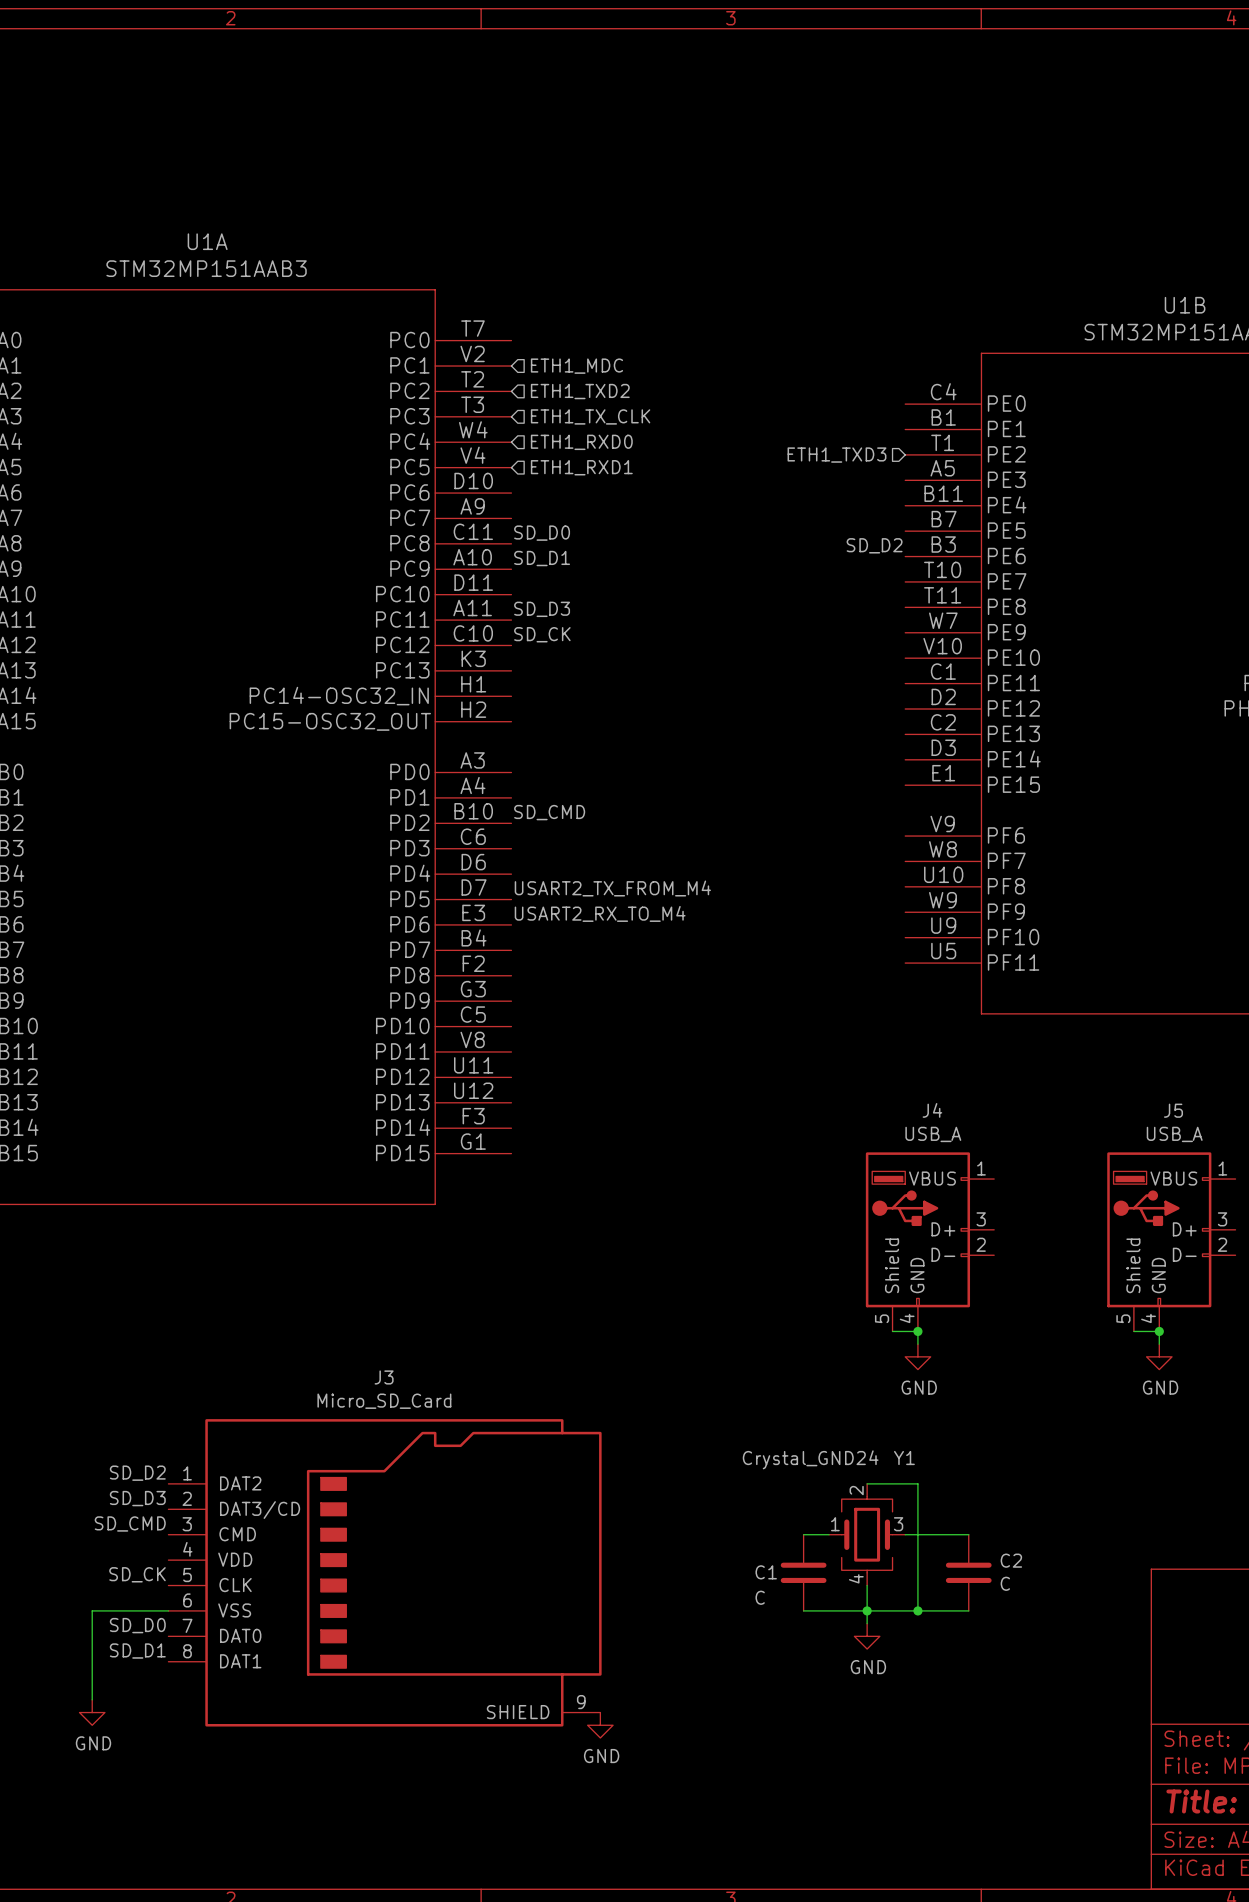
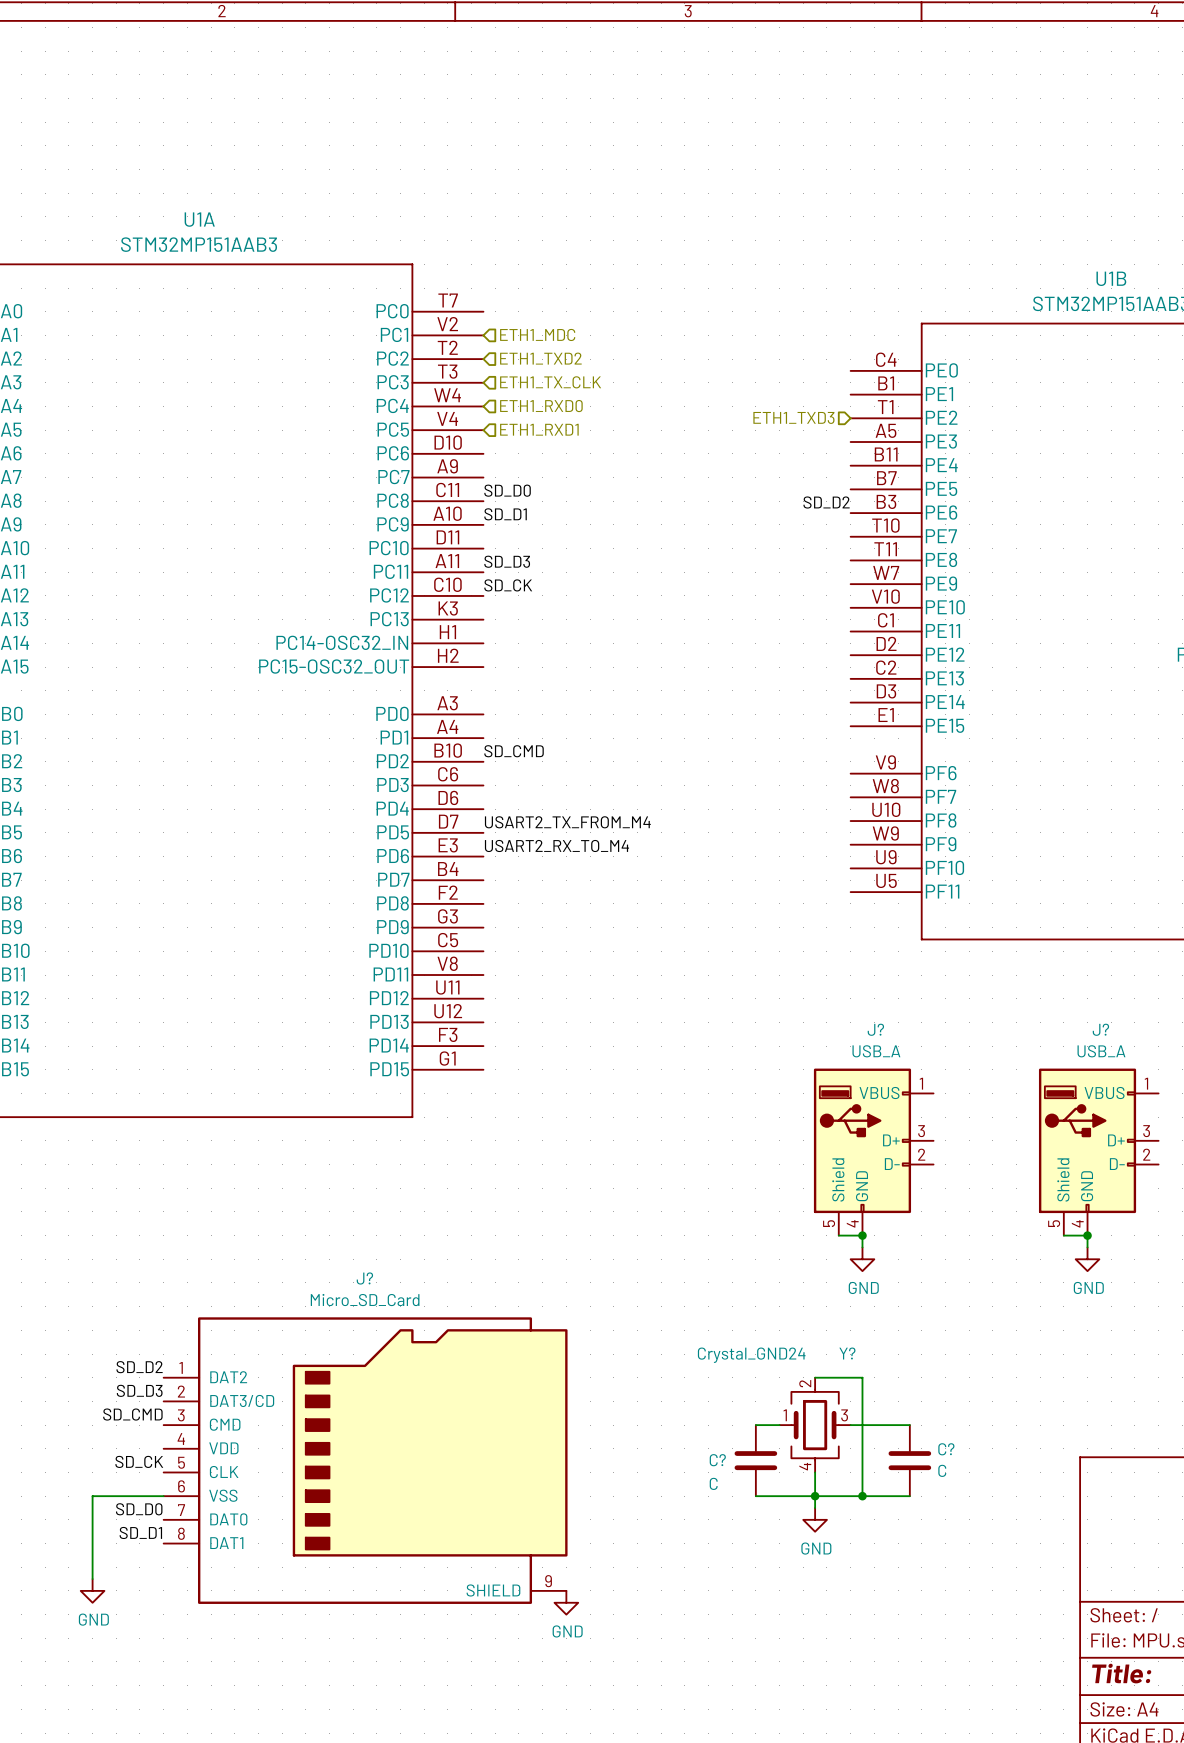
J4 name: J4 (932, 1110) -> J? (875, 1029)
J5 name: J5 (1173, 1110) -> J? (1100, 1029)
J3 name: J3 (384, 1377) -> J? (364, 1278)
Y1 name: Y1 (904, 1458) -> Y? (847, 1353)
C2 name: C2 (1011, 1560) -> C? (946, 1449)
C1 name: C1 (766, 1572) -> C? (717, 1460)

